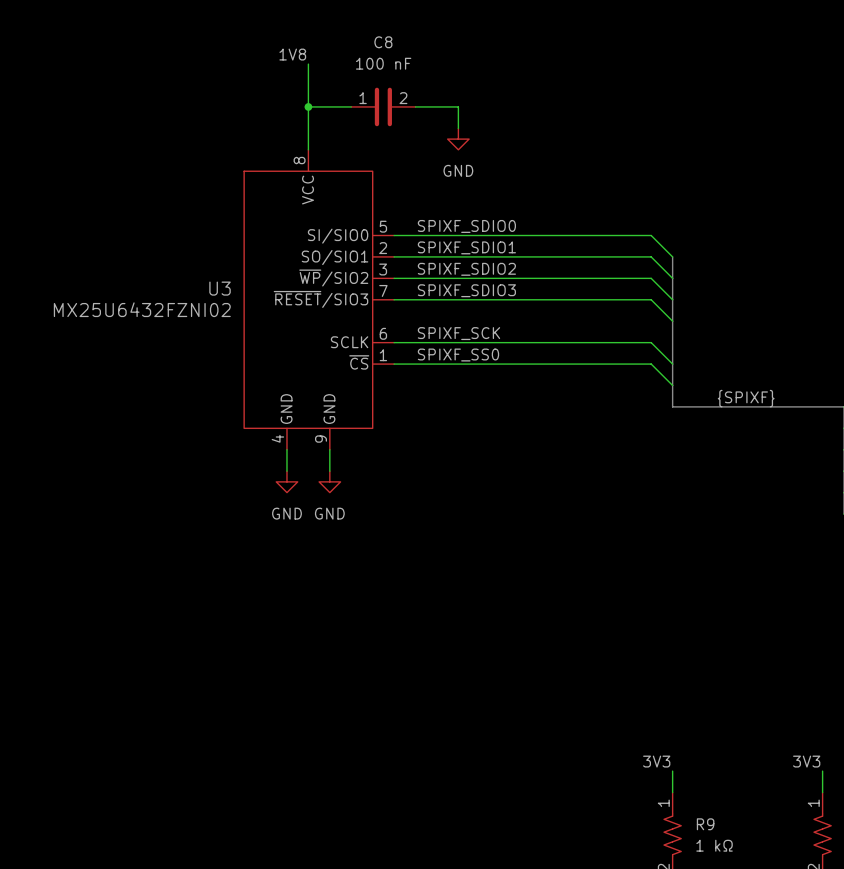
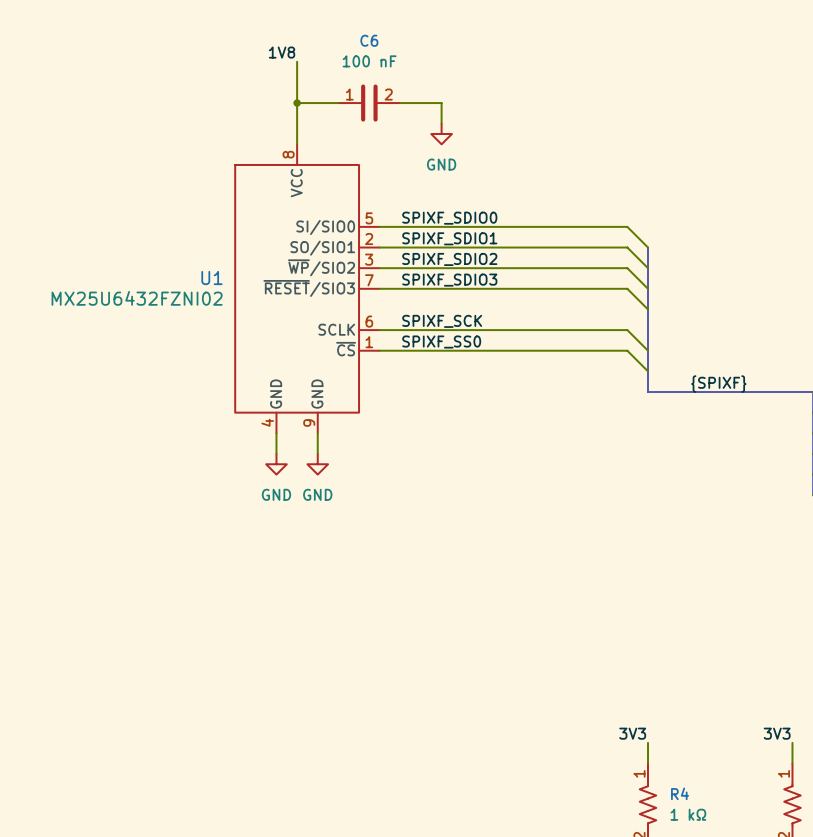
C8 name: C8 (383, 42) -> C6 (369, 40)
U3 name: U3 (220, 288) -> U1 (211, 278)
R9 name: R9 (705, 824) -> R4 (680, 793)

